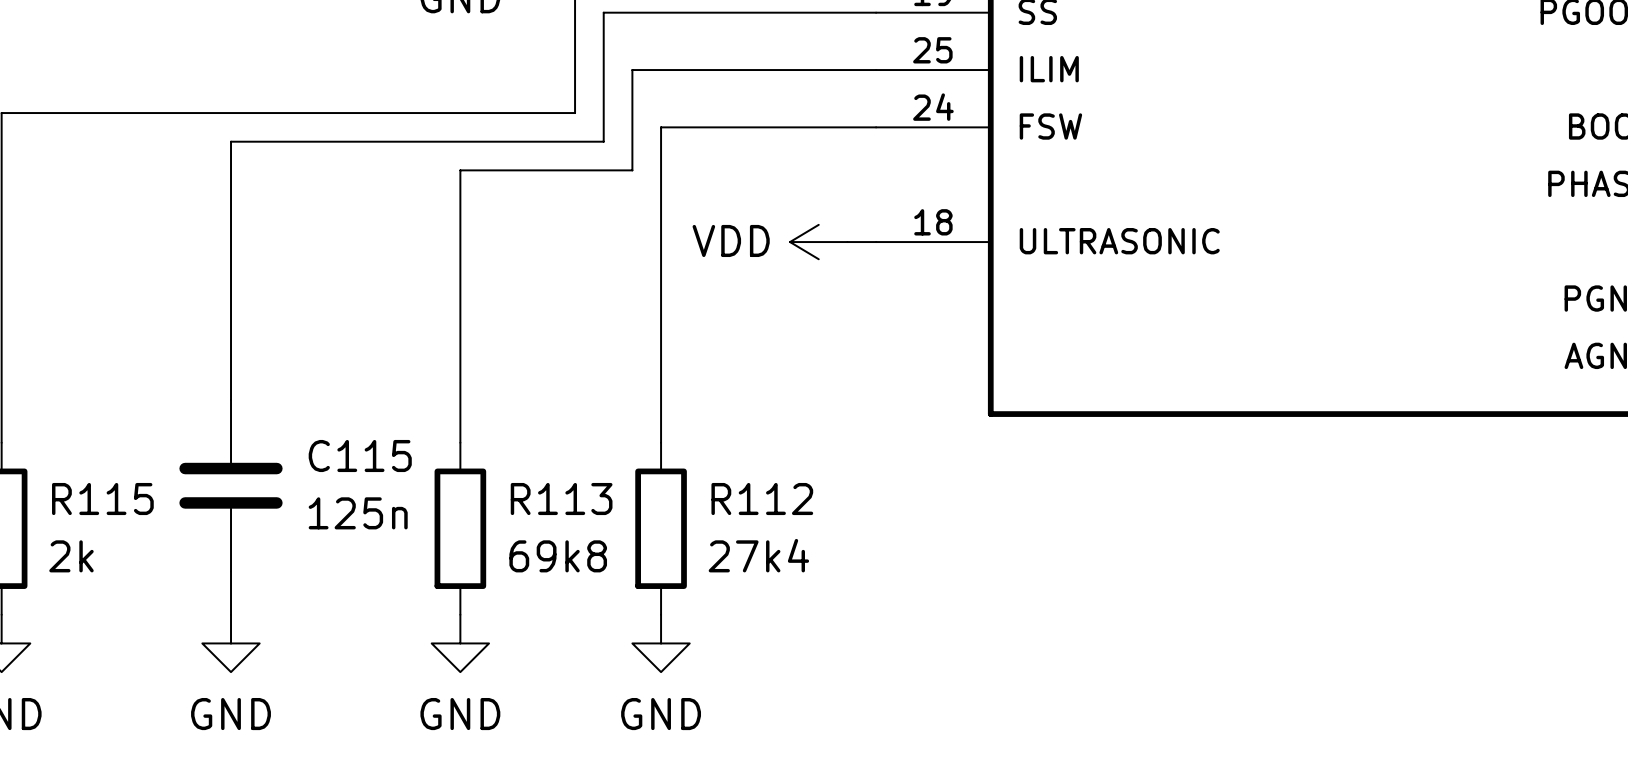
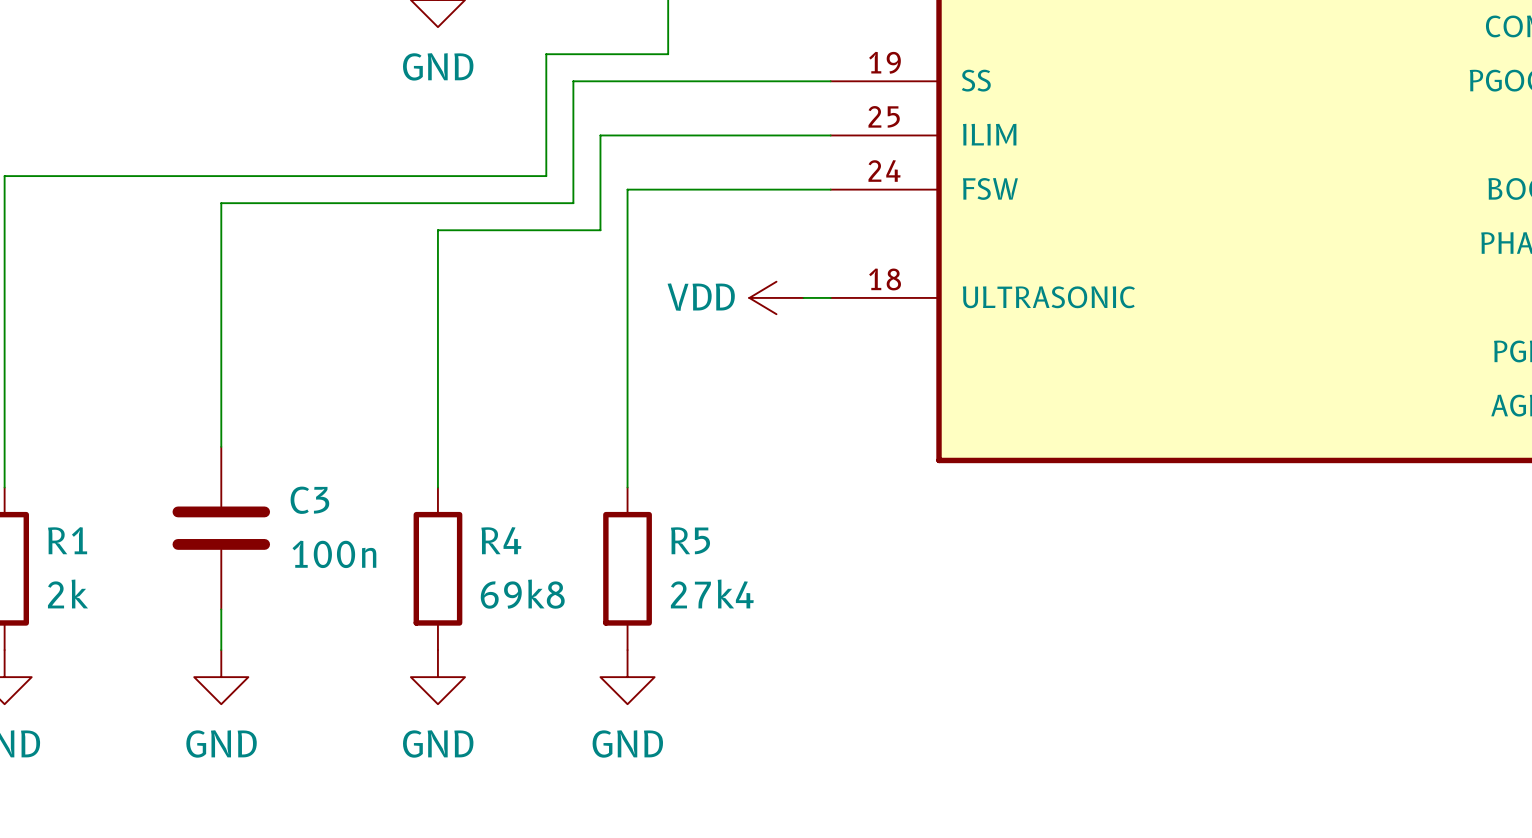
C115 name: C115 (360, 456) -> C3 (309, 500)
R115 name: R115 (102, 499) -> R1 (67, 540)
R113 name: R113 (561, 499) -> R4 (501, 540)
R112 name: R112 (762, 499) -> R5 (690, 540)
C115 value: 125n (358, 513) -> 100n (334, 554)

